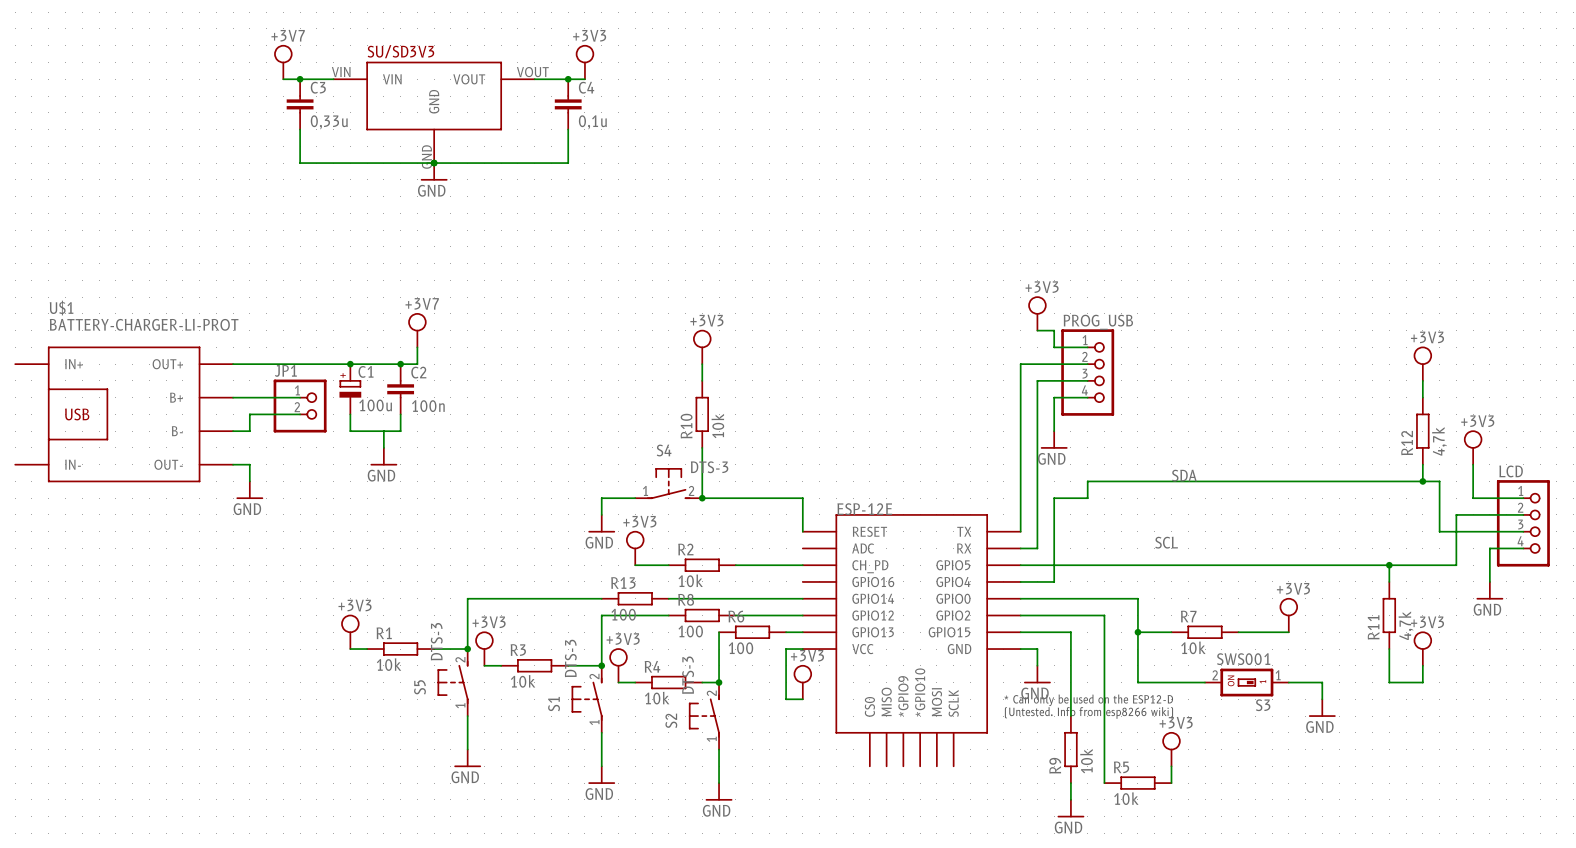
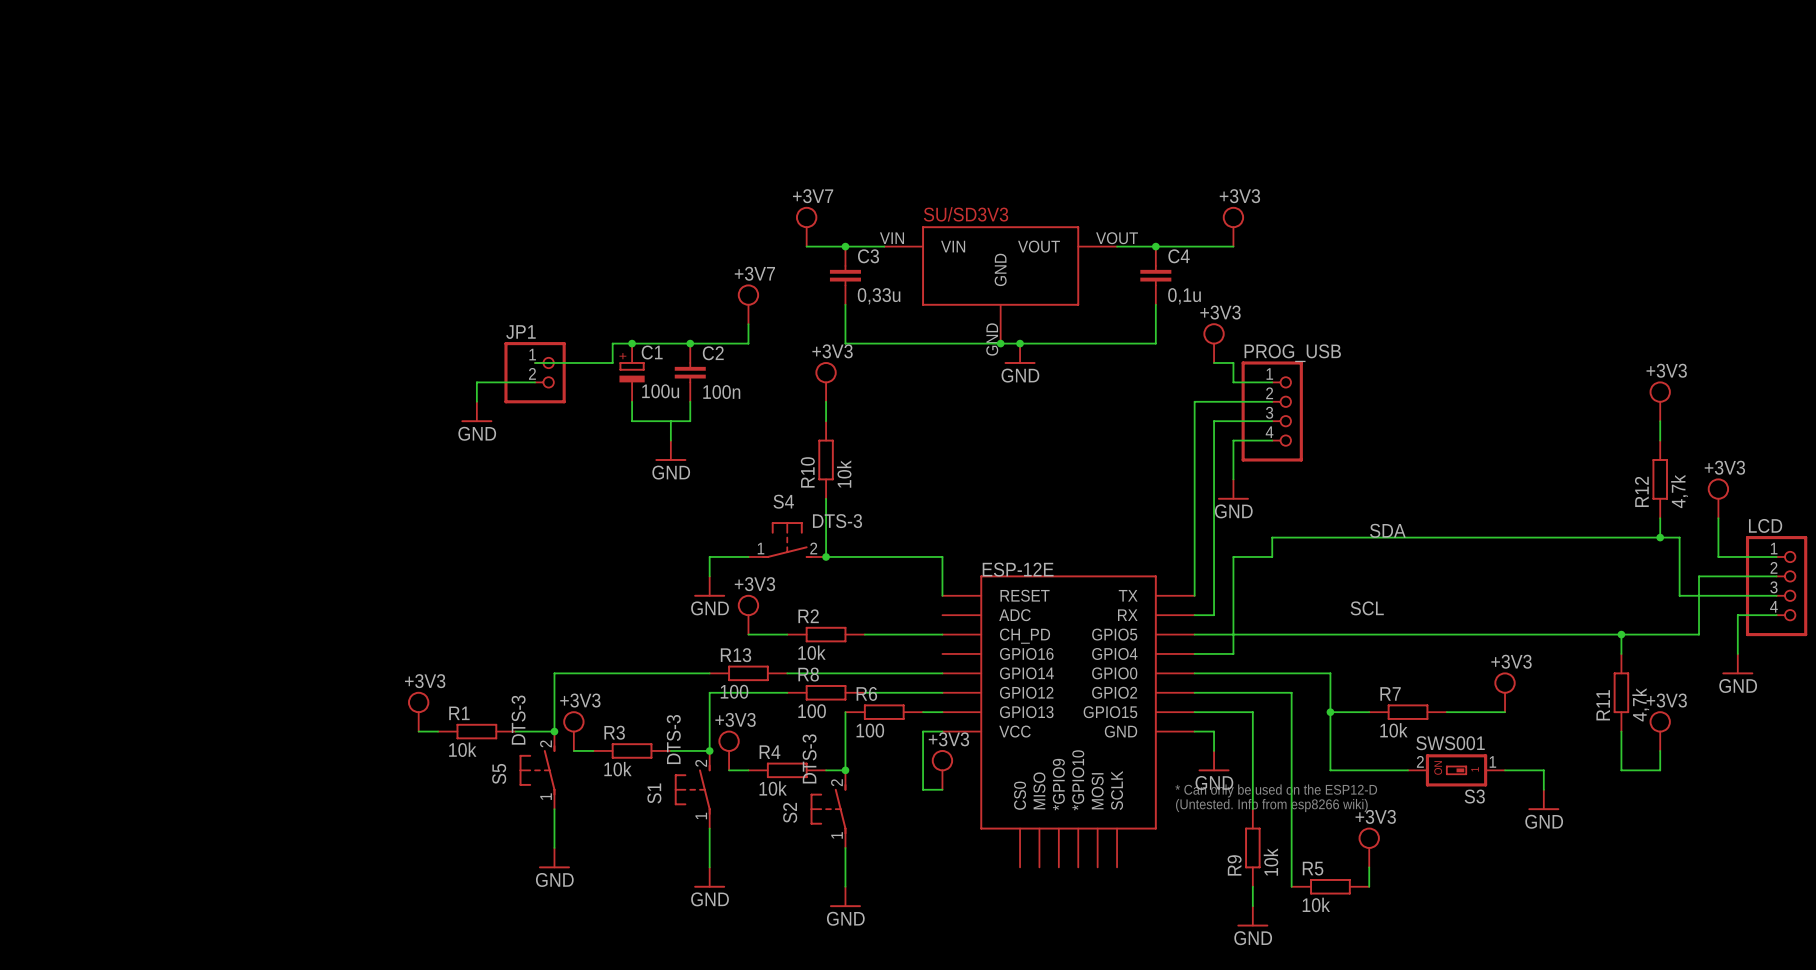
power symbol: +3V7 (283, 62) -> none
power symbol: +3V3 (584, 62) -> none
wire: (283, 79) (333, 79) -> none
junction: (300, 79) -> none
wire: (534, 79) (584, 79) -> none
junction: (568, 79) -> none
C3 position: (300, 104) -> (845, 275)
C4 position: (568, 104) -> (1155, 275)
SU/SD3V3 position: (434, 112) -> (1000, 284)
wire: (300, 129) (300, 163) (568, 163) (568, 129) -> none
junction: (434, 163) -> none
power symbol: GND (434, 171) -> none
power symbol: none -> +3V7 (806, 226)
power symbol: none -> +3V3 (1233, 226)
wire: none -> (806, 246) (884, 246)
junction: none -> (845, 246)
wire: none -> (1117, 246) (1233, 246)
junction: none -> (1155, 246)
power symbol: none -> +3V7 (748, 304)
wire: none -> (845, 304) (845, 343) (1155, 343) (1155, 304)
wire: none -> (748, 324) (748, 343) (612, 343) (612, 362) (535, 362)
junction: none -> (632, 343)
junction: none -> (690, 343)
junction: none -> (1000, 343)
junction: none -> (1020, 343)
power symbol: none -> GND (1020, 353)
power symbol: +3V7 (417, 330) -> none
wire: (417, 347) (417, 364) (233, 364) -> none
wire: none -> (535, 382) (476, 382) (476, 401)
junction: (350, 364) -> none
junction: (400, 364) -> none
wire: none -> (632, 401) (632, 421) (690, 421) (690, 401)
wire: none -> (670, 421) (670, 440)
C1 position: (350, 389) -> (632, 372)
C2 position: (400, 389) -> (690, 372)
wire: (233, 397) (300, 397) -> none
JP1 position: (300, 406) -> (535, 372)
power symbol: none -> GND (670, 450)
U$1: BATTERY-CHARGER-LI-PROT (124, 414) -> none
wire: (300, 414) (249, 414) (249, 431) (233, 431) -> none
wire: (350, 414) (350, 431) (400, 431) (400, 414) -> none
wire: (383, 431) (383, 447) -> none
power symbol position: GND (383, 456) -> GND (476, 411)
wire: (233, 464) (249, 464) (249, 481) -> none
power symbol: GND (249, 490) -> none

